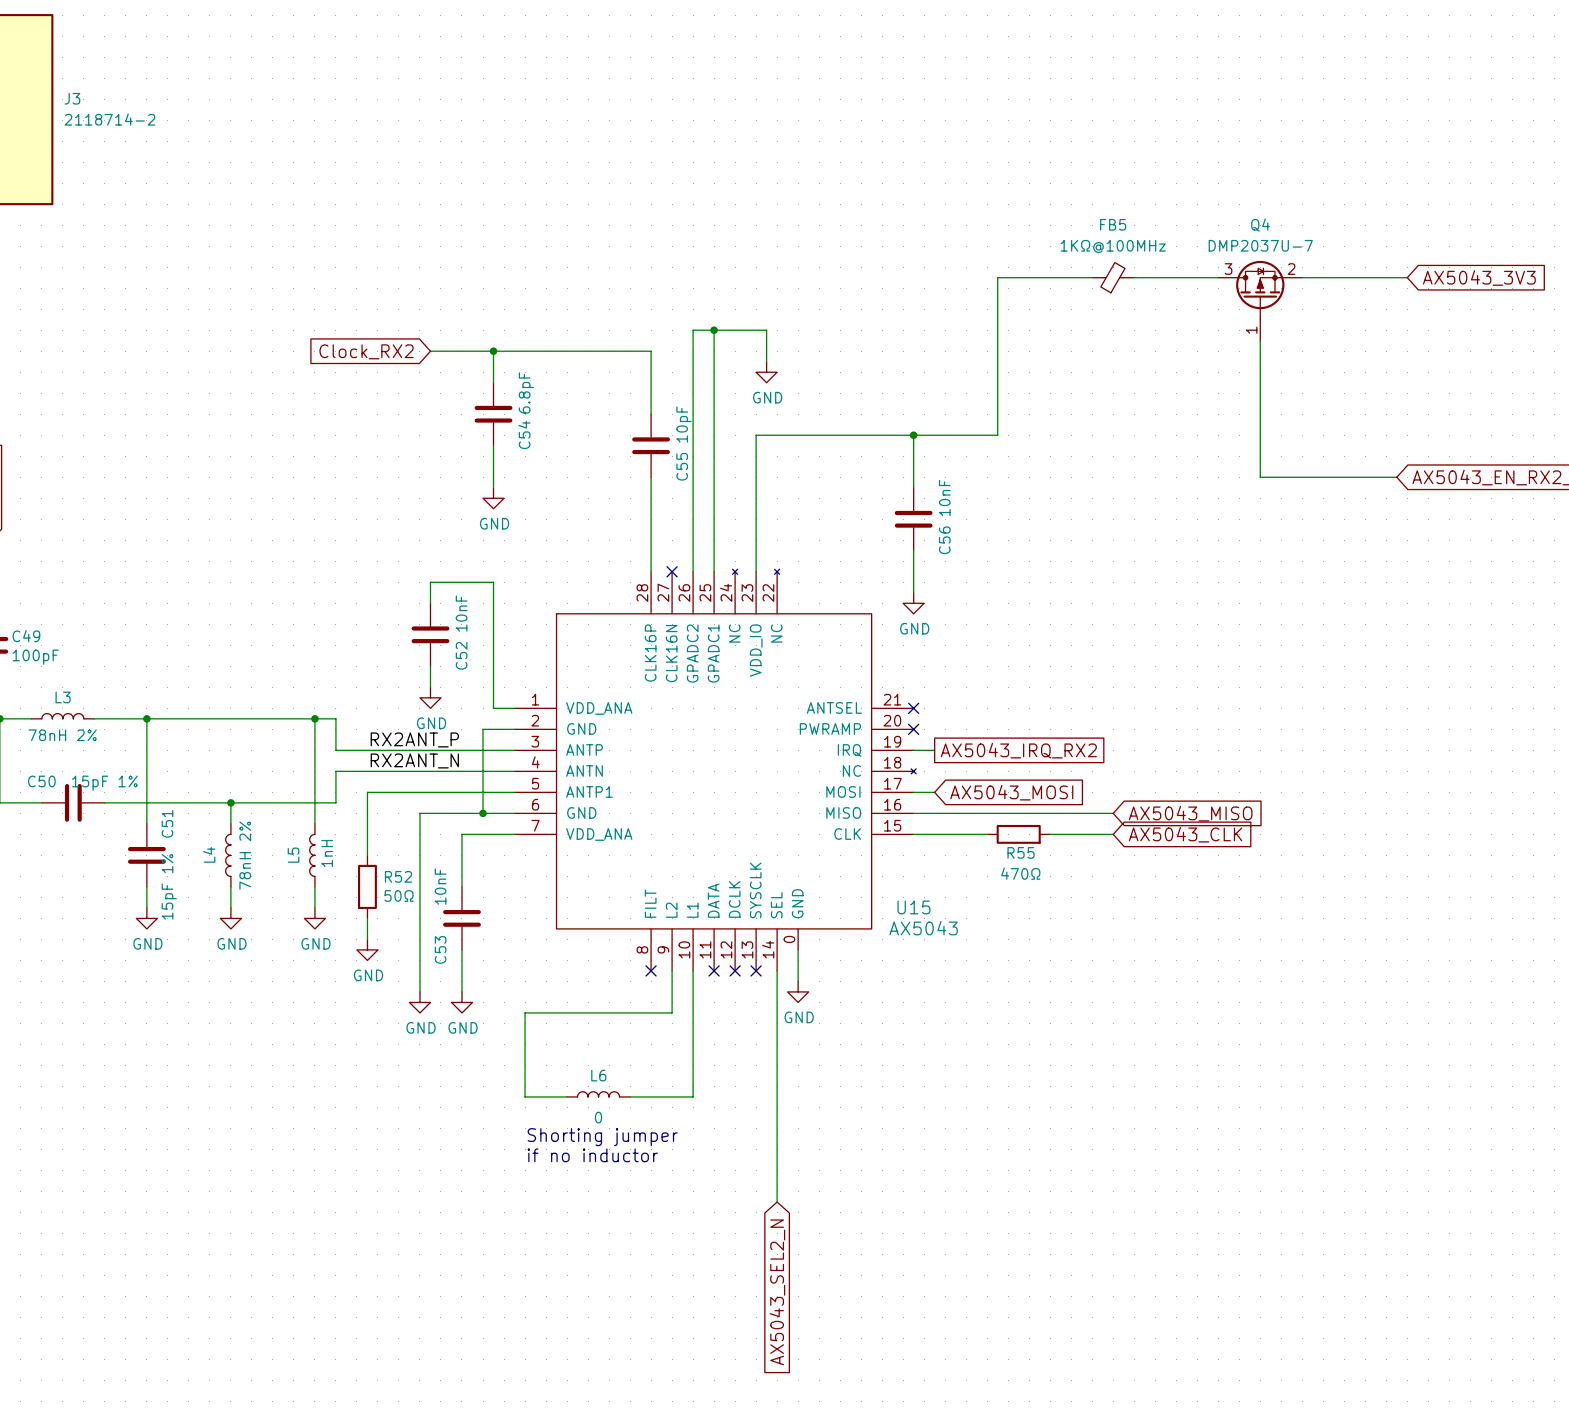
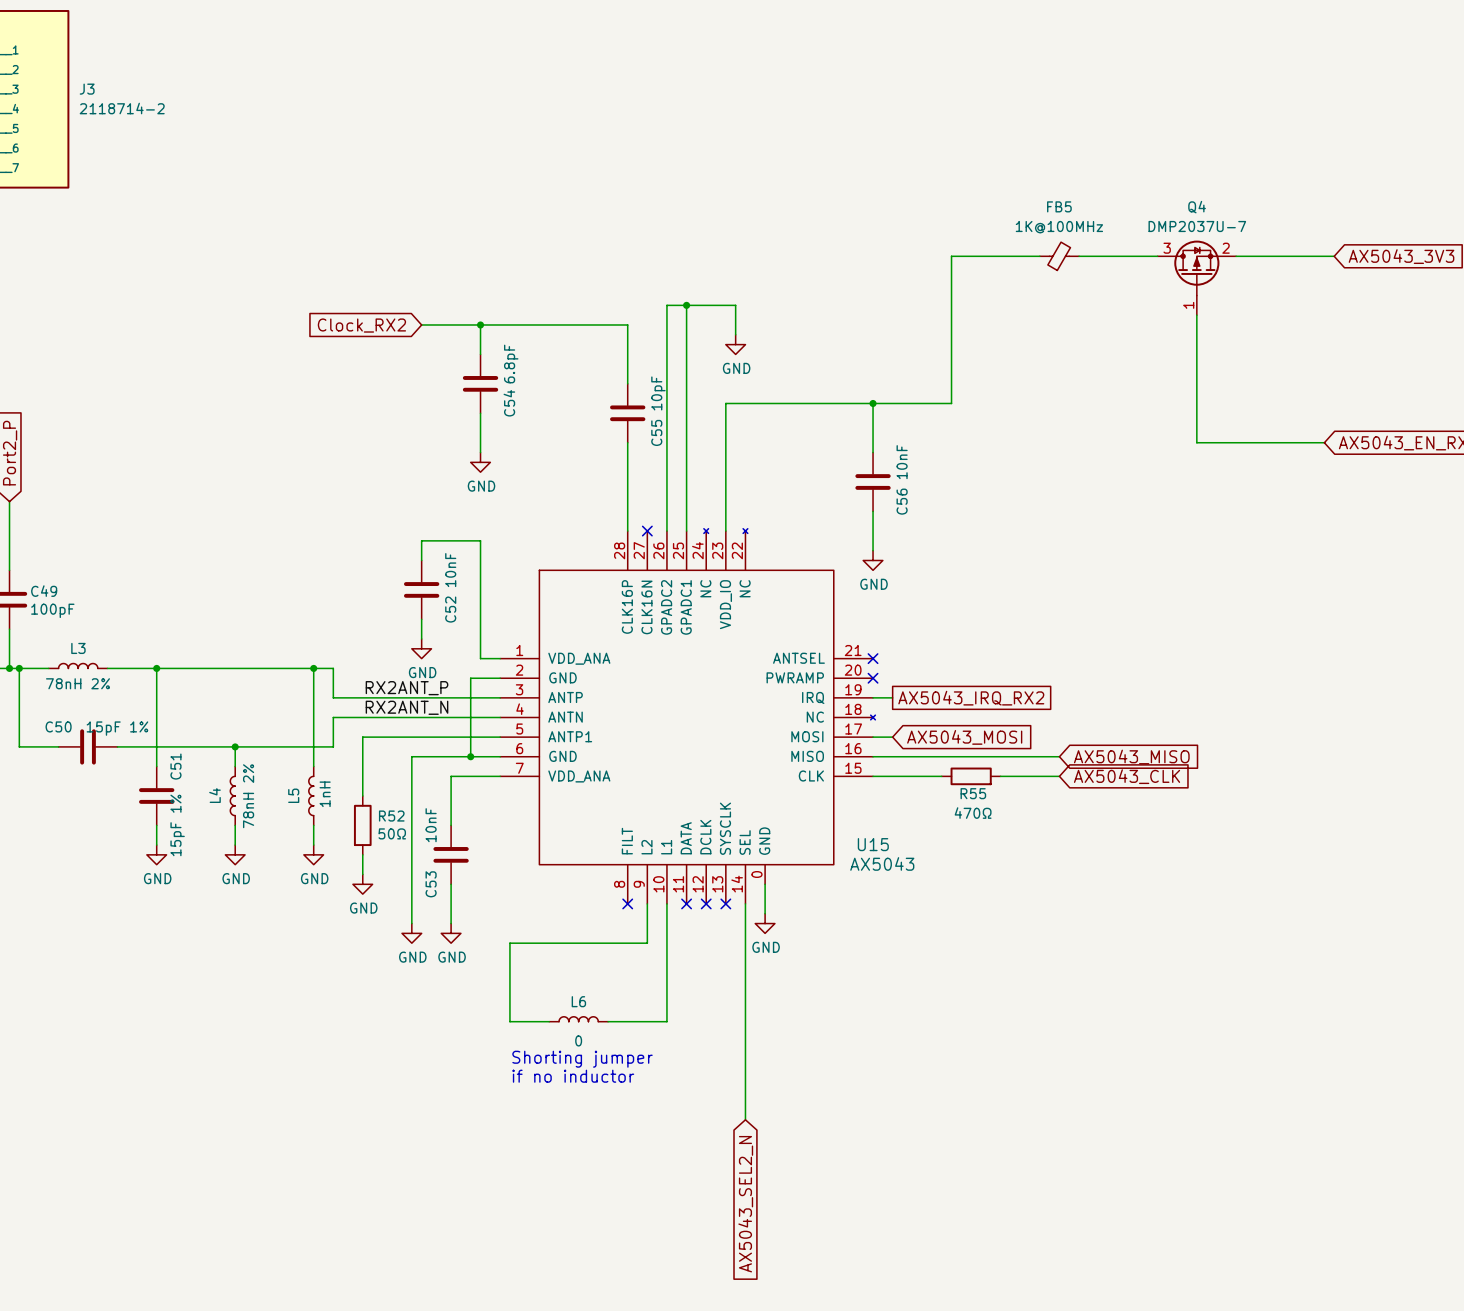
FB5 value: 1KΩ@100MHz (1113, 246) -> 1K@100MHz (1059, 227)

